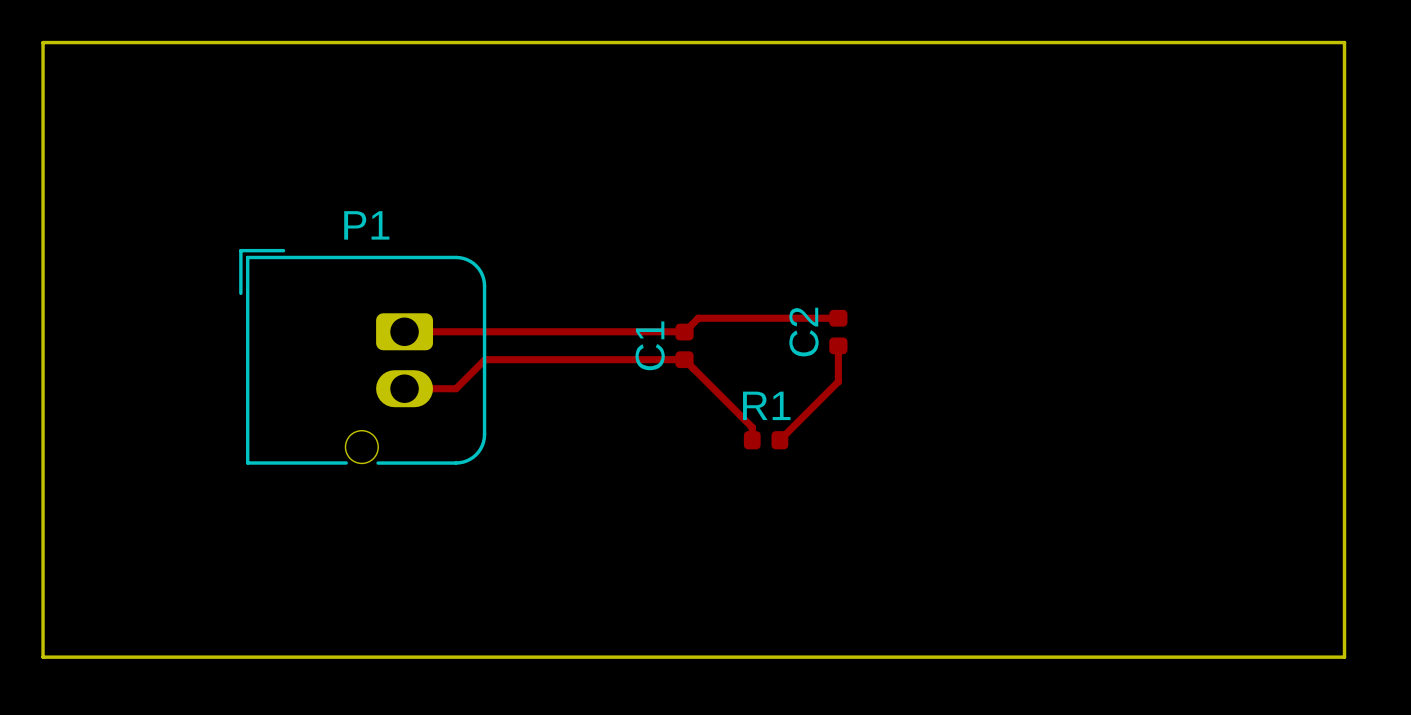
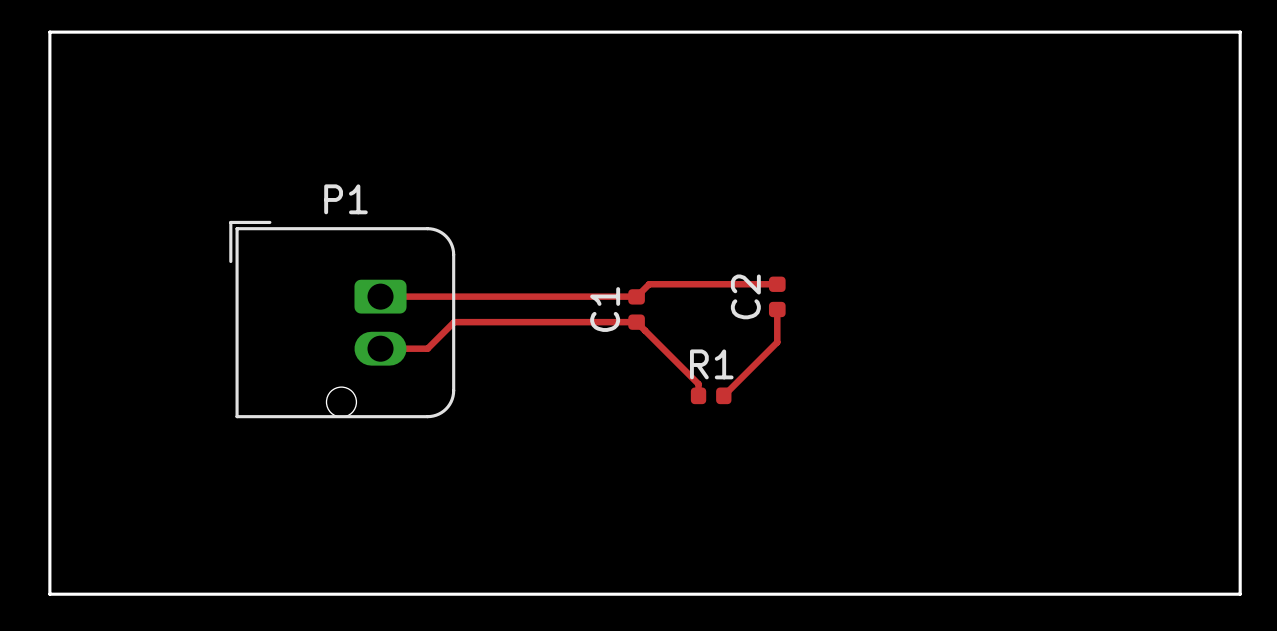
P1 footprint: [239, 248, 487, 465] -> [229, 220, 456, 419]

